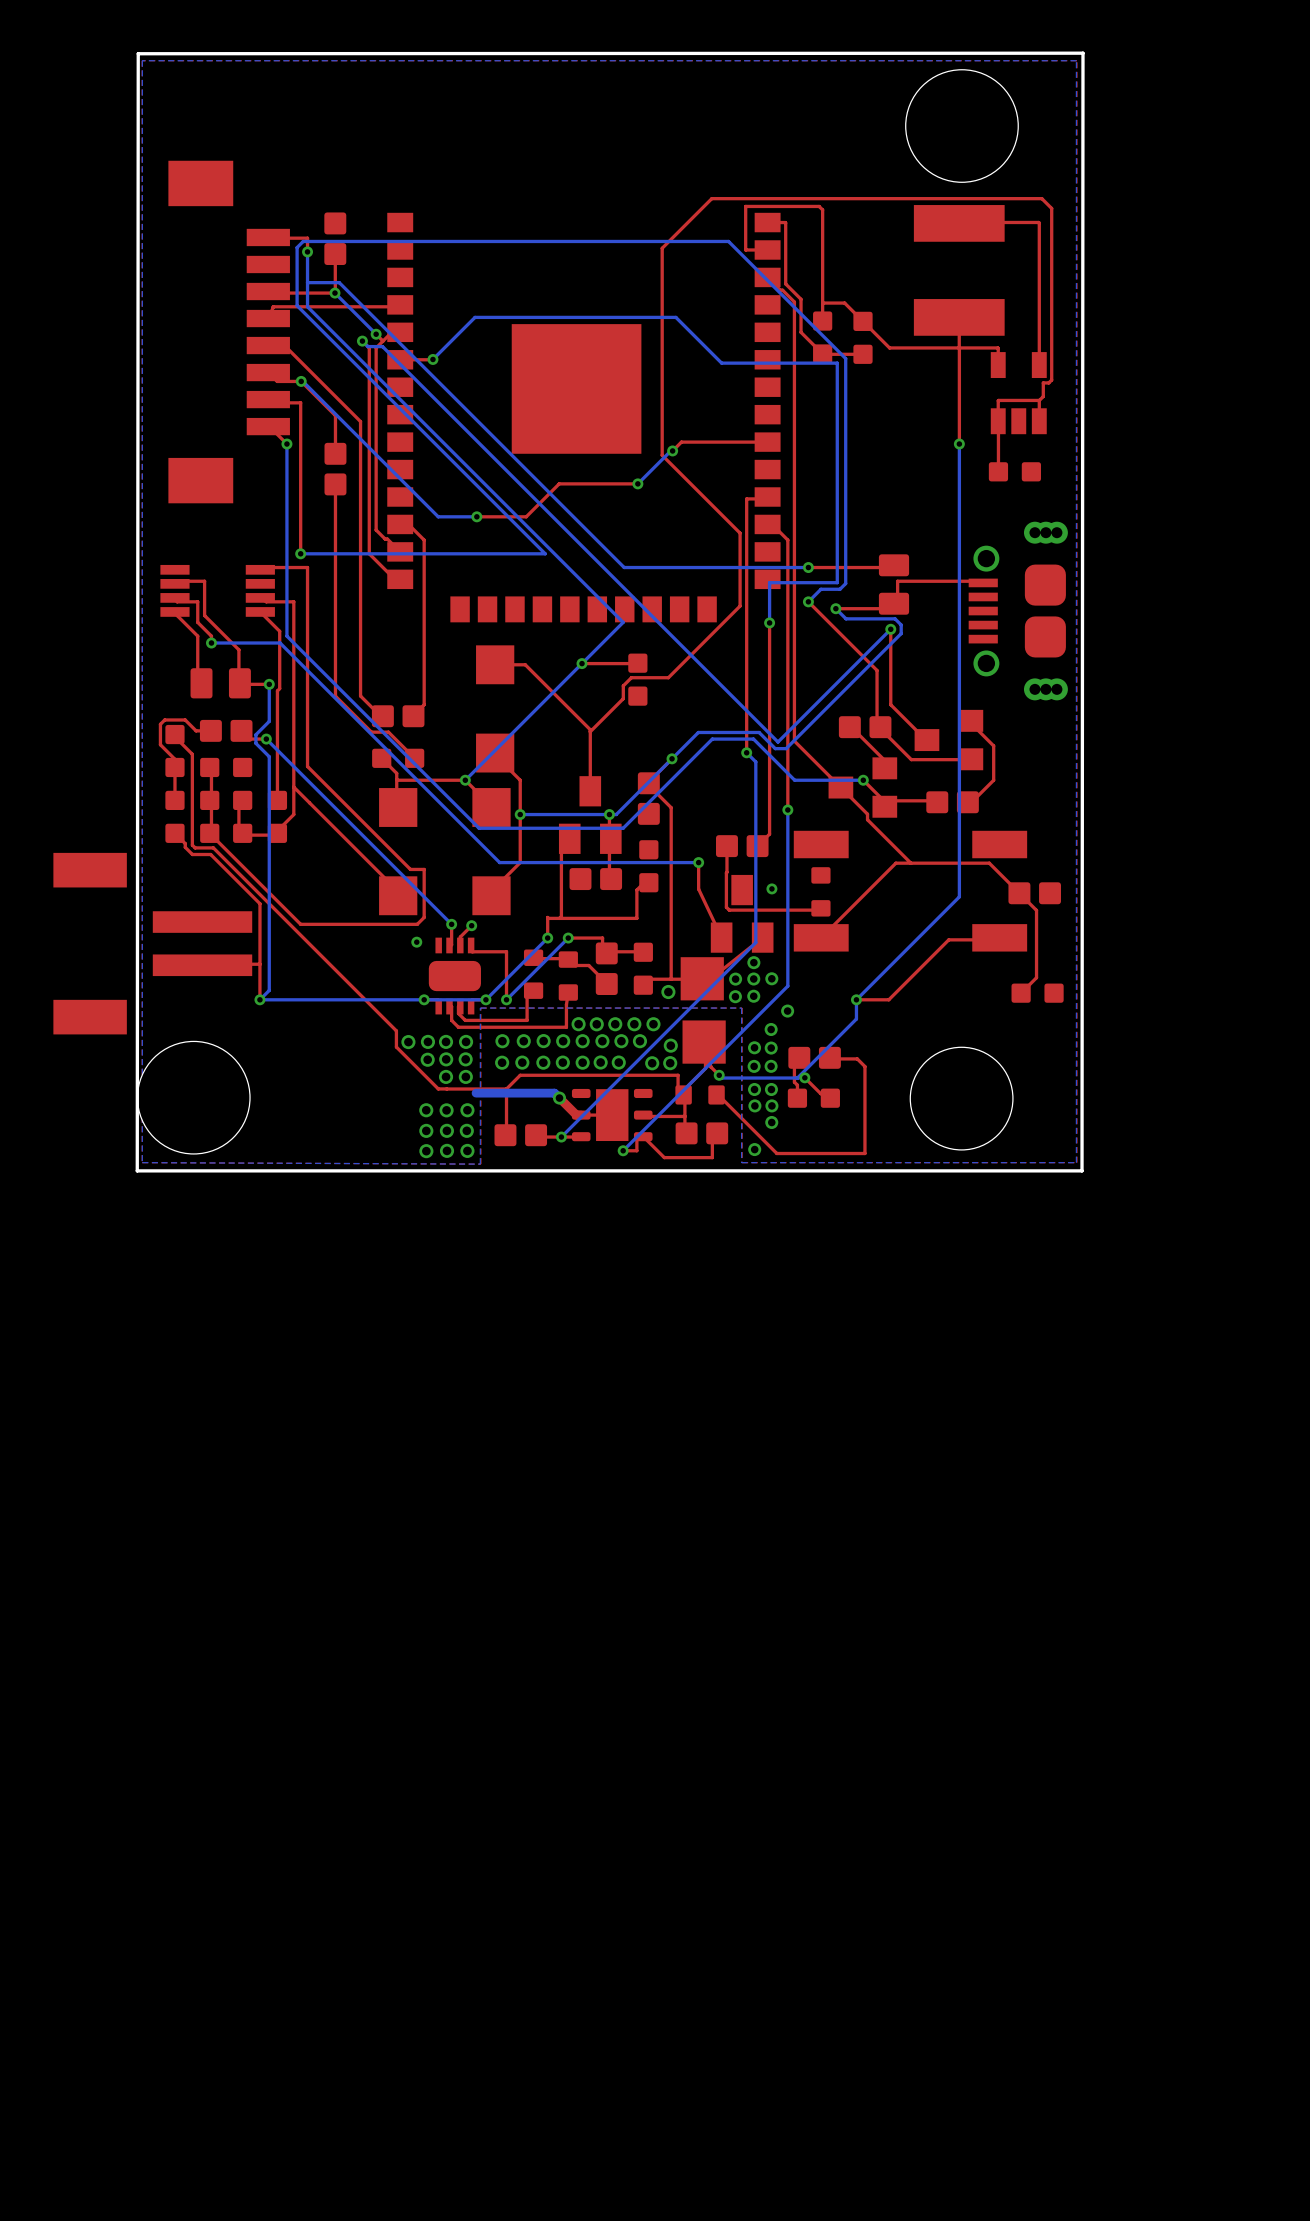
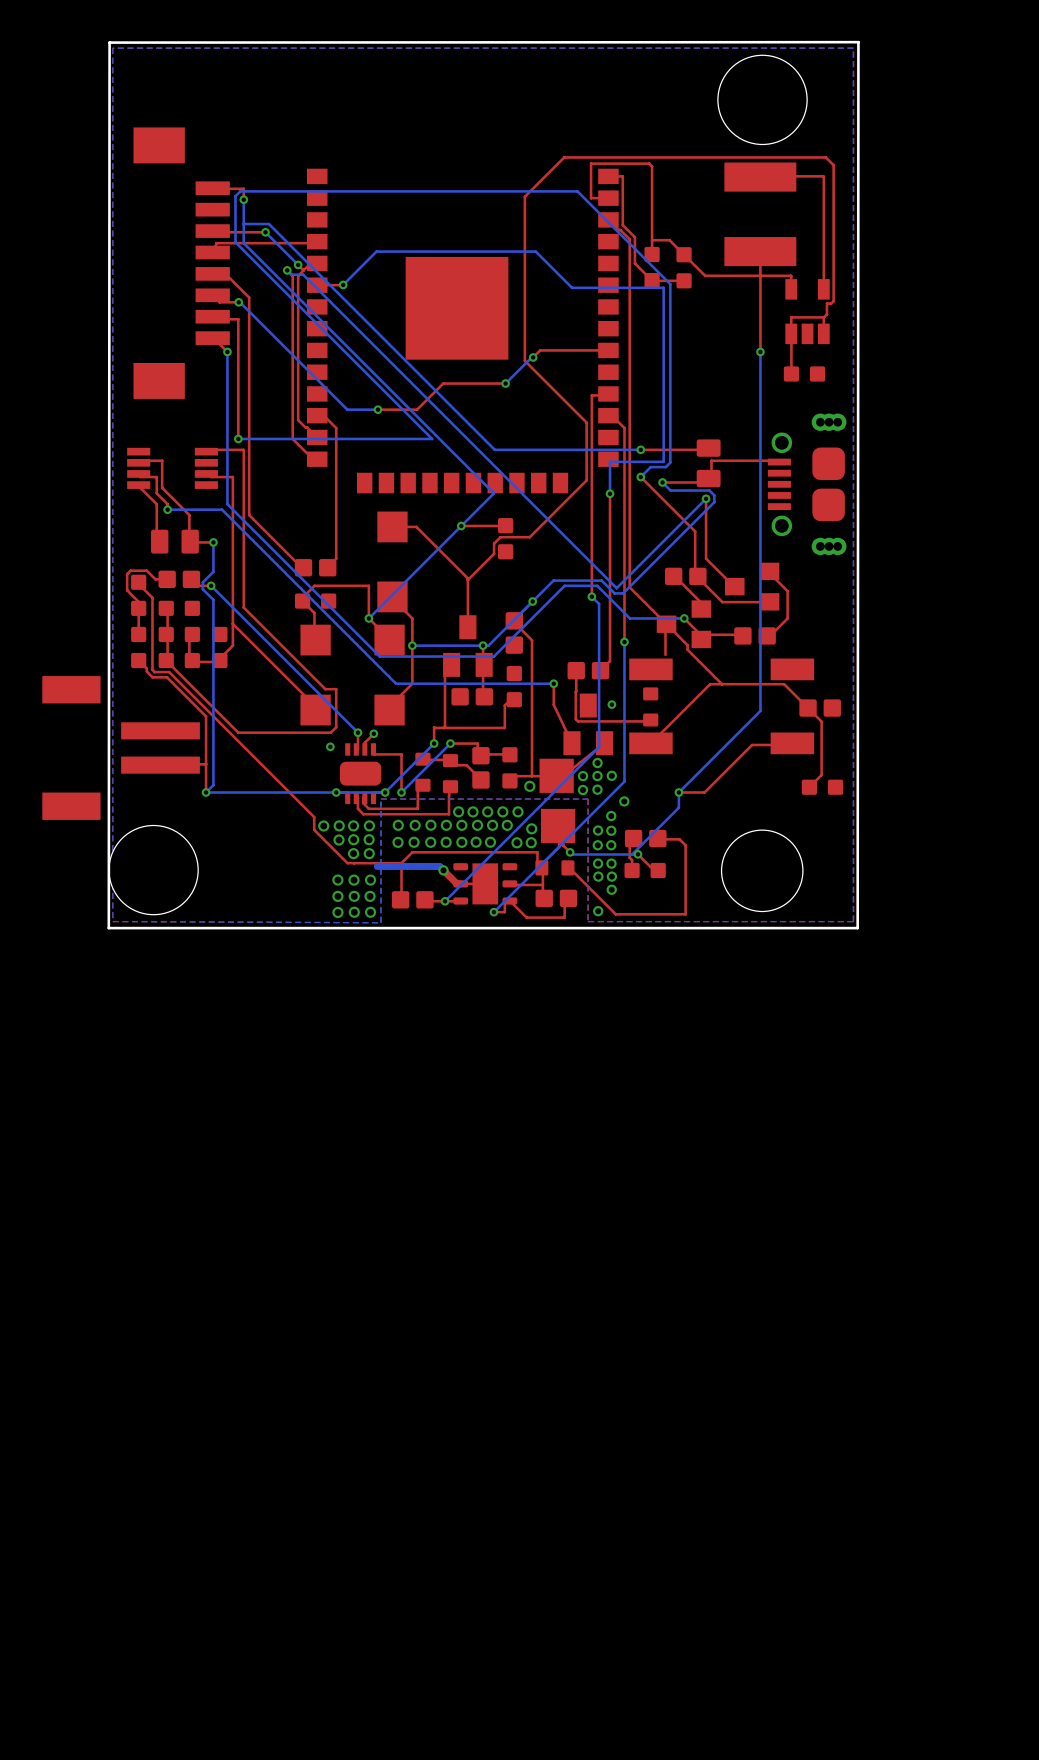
part: (335, 238) -> none
top track: (335, 254) (334, 293) -> none
top track: (314, 375) (360, 421) (360, 696) -> (249, 297) (249, 515) (285, 551)
top track: (301, 381) (335, 415) (335, 453) -> none
part: (335, 469) -> none
top track: (335, 484) (335, 696) (371, 732) (388, 732) (414, 758) -> none
top track: (260, 611) (279, 631) (277, 800) -> none
top track: (396, 779) (465, 780) -> (303, 596) (314, 585) (368, 585) (368, 618)
top track: none -> (665, 623) (665, 654)

